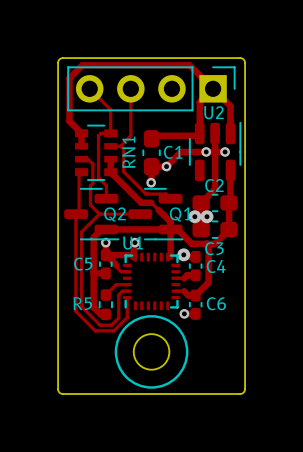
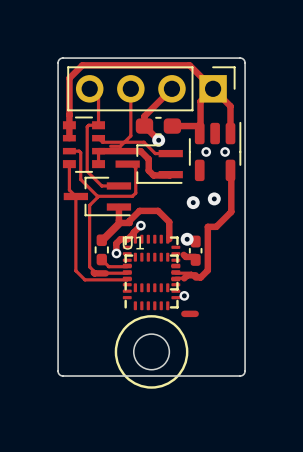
track: none -> (171, 88) (144, 116) (144, 126) (158, 140)
track: (98, 97) (110, 109) (110, 133) (100, 133) (98, 135) (98, 151) -> (98, 97) (98, 125) (87, 126) (87, 171) (101, 185) (118, 185)
track: (200, 101) (199, 133) (197, 135) (154, 135) (151, 138) -> (200, 101) (200, 128) (197, 126) (172, 126)
U2 name: U2 (213, 112) -> none
track: (69, 114) (69, 121) (81, 133) (81, 146) -> (69, 114) (69, 138)
part: none -> (158, 126)
track: (215, 133) (215, 189) (201, 202) (201, 229) -> none
track: none -> (98, 138) (102, 142) (143, 142) (155, 153) (170, 153)
via: none -> (158, 140)
track: (120, 146) (123, 149) (123, 171) (145, 194) (165, 194) (170, 198) -> none
track: none -> (69, 151) (80, 152) (80, 179) (97, 196)
track: none -> (98, 151) (140, 151) (148, 159) (148, 170) (153, 175) (170, 174)
track: (225, 151) (181, 151) (166, 166) (151, 166) (151, 182) -> none
RN1 position: (96, 152) -> (83, 144)
RN1 name: RN1 (128, 152) -> none
C1: (151, 152) -> none
track: (81, 159) (88, 159) (92, 164) (90, 205) (99, 214) -> none
track: (110, 159) (110, 172) (141, 202) (151, 202) -> none
track: (98, 164) (98, 177) (106, 185) (106, 198) -> none
track: none -> (127, 164) (131, 164) (135, 168) (135, 193) (132, 196) (97, 196)
part: none -> (149, 164)
track: none -> (231, 165) (231, 211) (216, 226) (207, 226) (207, 270) (200, 277) (195, 277) (191, 273) (175, 273)
via: (166, 166) -> none
track: (230, 170) (229, 229) (214, 243) (191, 243) (177, 229) (101, 229) (93, 237) (93, 307) (100, 314) (106, 314) -> none
track: (81, 172) (79, 174) (79, 211) (75, 214) -> (69, 164) (69, 190) (75, 196) (75, 214)
via: (151, 182) -> none
track: none -> (97, 196) (89, 205) (89, 266) (95, 273) (127, 273)
part: none -> (97, 196)
via: none -> (214, 198)
via: none -> (193, 202)
C2: (215, 202) -> none
track: (152, 203) (170, 221) (169, 257) -> none
track: none -> (118, 207) (118, 220)
Q2: (91, 214) -> none
track: (99, 214) (140, 214) -> none
track: (99, 214) (81, 232) (81, 306) (100, 325) (111, 325) (118, 317) (118, 294) (122, 291) (127, 291) -> none
Q1: (155, 214) -> none
via: (194, 216) -> none
via: (207, 216) -> none
track: none -> (118, 224) (101, 240) (119, 222) (129, 222) (139, 210) (158, 210) (169, 222) (169, 239)
track: none -> (140, 225) (127, 239) (120, 239) (116, 243) (116, 251)
via: none -> (140, 225)
C3: (215, 229) -> none
via: none -> (187, 239)
track: (105, 242) (105, 255) (131, 255) (133, 257) (134, 242) -> none
via: (105, 242) -> none
via: (134, 242) -> none
track: (207, 243) (208, 245) (208, 282) (195, 295) (188, 295) (184, 291) (175, 291) -> none
part: none -> (101, 249)
via: none -> (116, 253)
via: (183, 254) -> none
track: (110, 255) (111, 260) (116, 266) (121, 271) (127, 271) -> none
track: none -> (101, 259) (108, 266) (127, 266)
part: none -> (151, 263)
C5: (105, 264) -> none
C4 position: (195, 266) -> (195, 250)
C4 name: C4 (216, 266) -> none
track: (75, 270) (75, 311) (95, 330) (113, 330) (127, 317) (127, 297) -> (75, 270) (84, 279) (127, 279)
track: (127, 284) (116, 284) (105, 295) -> none
R5: (105, 304) -> none
C6: (195, 304) -> none
via position: (184, 313) -> (184, 295)
board edge: (58, 371) (58, 390) (62, 394) (240, 393) (245, 389) (245, 371) -> (58, 371) (62, 376) (240, 376) (245, 371)

